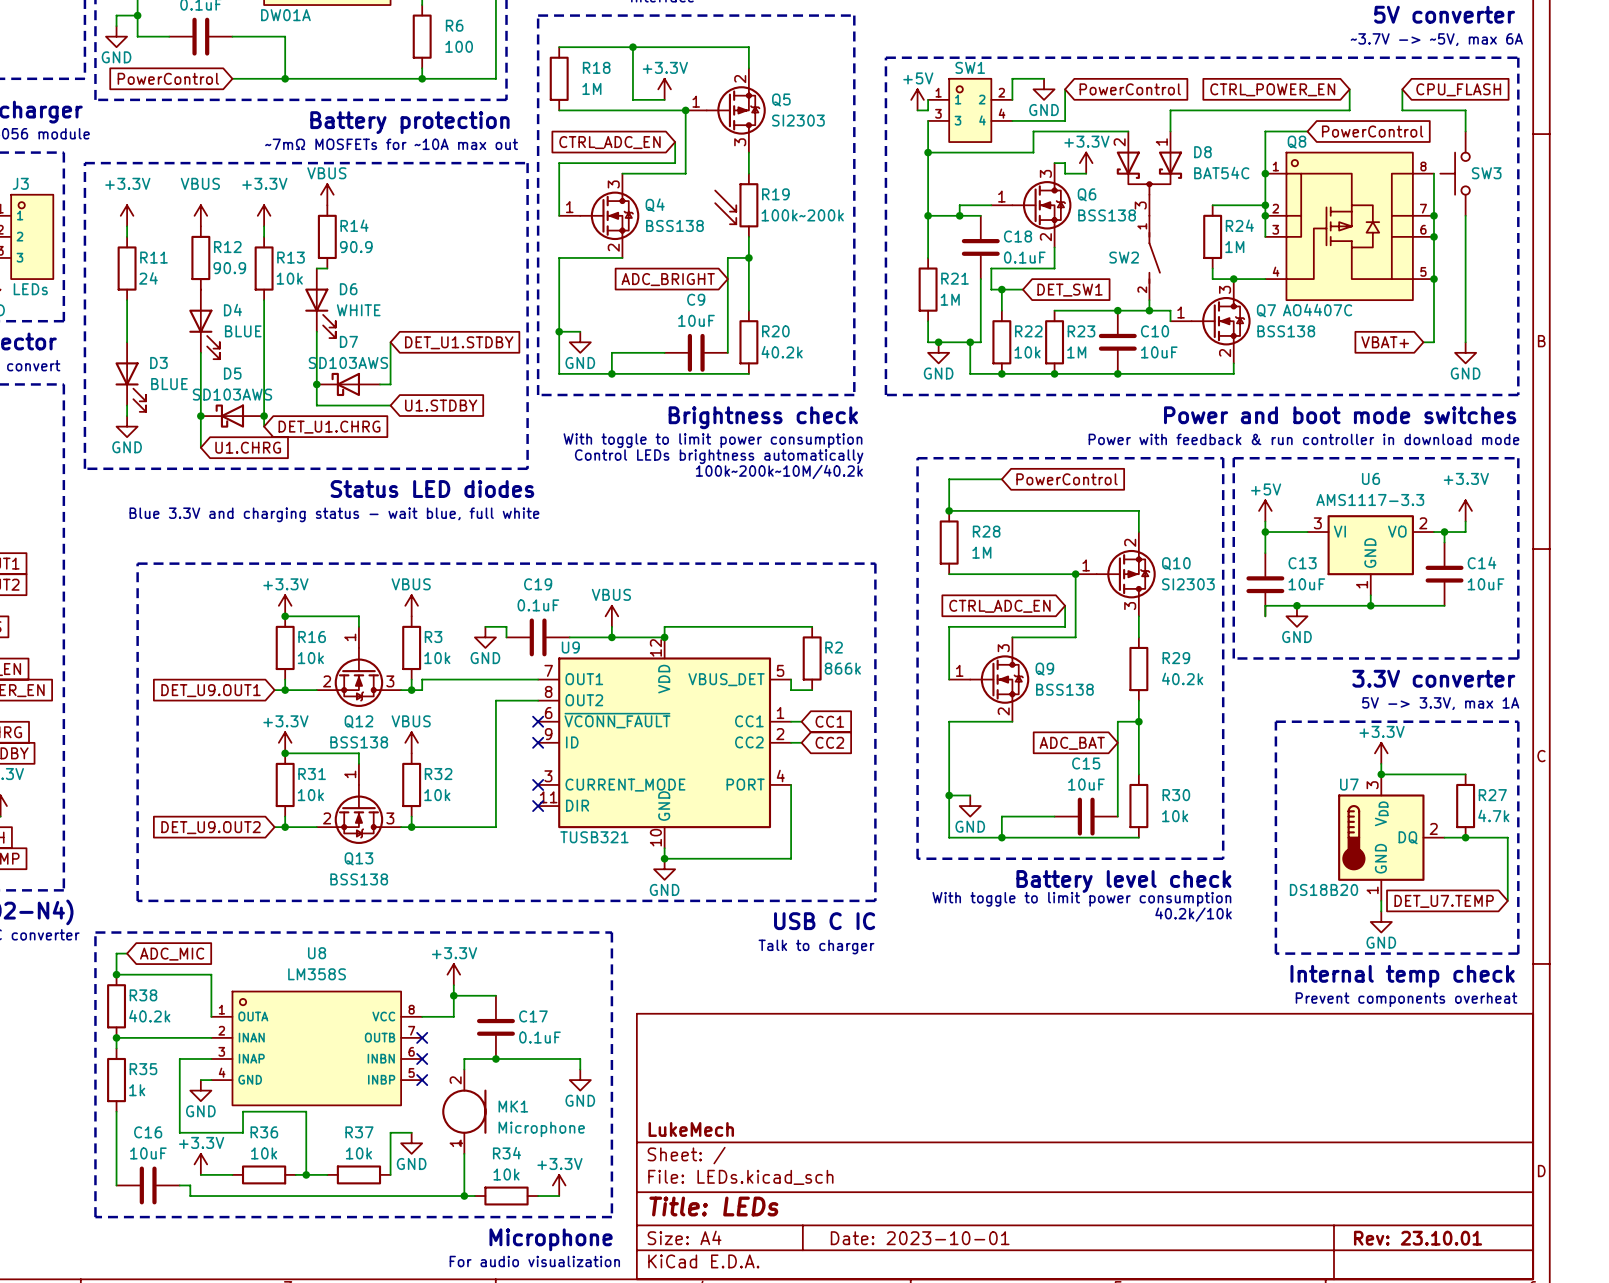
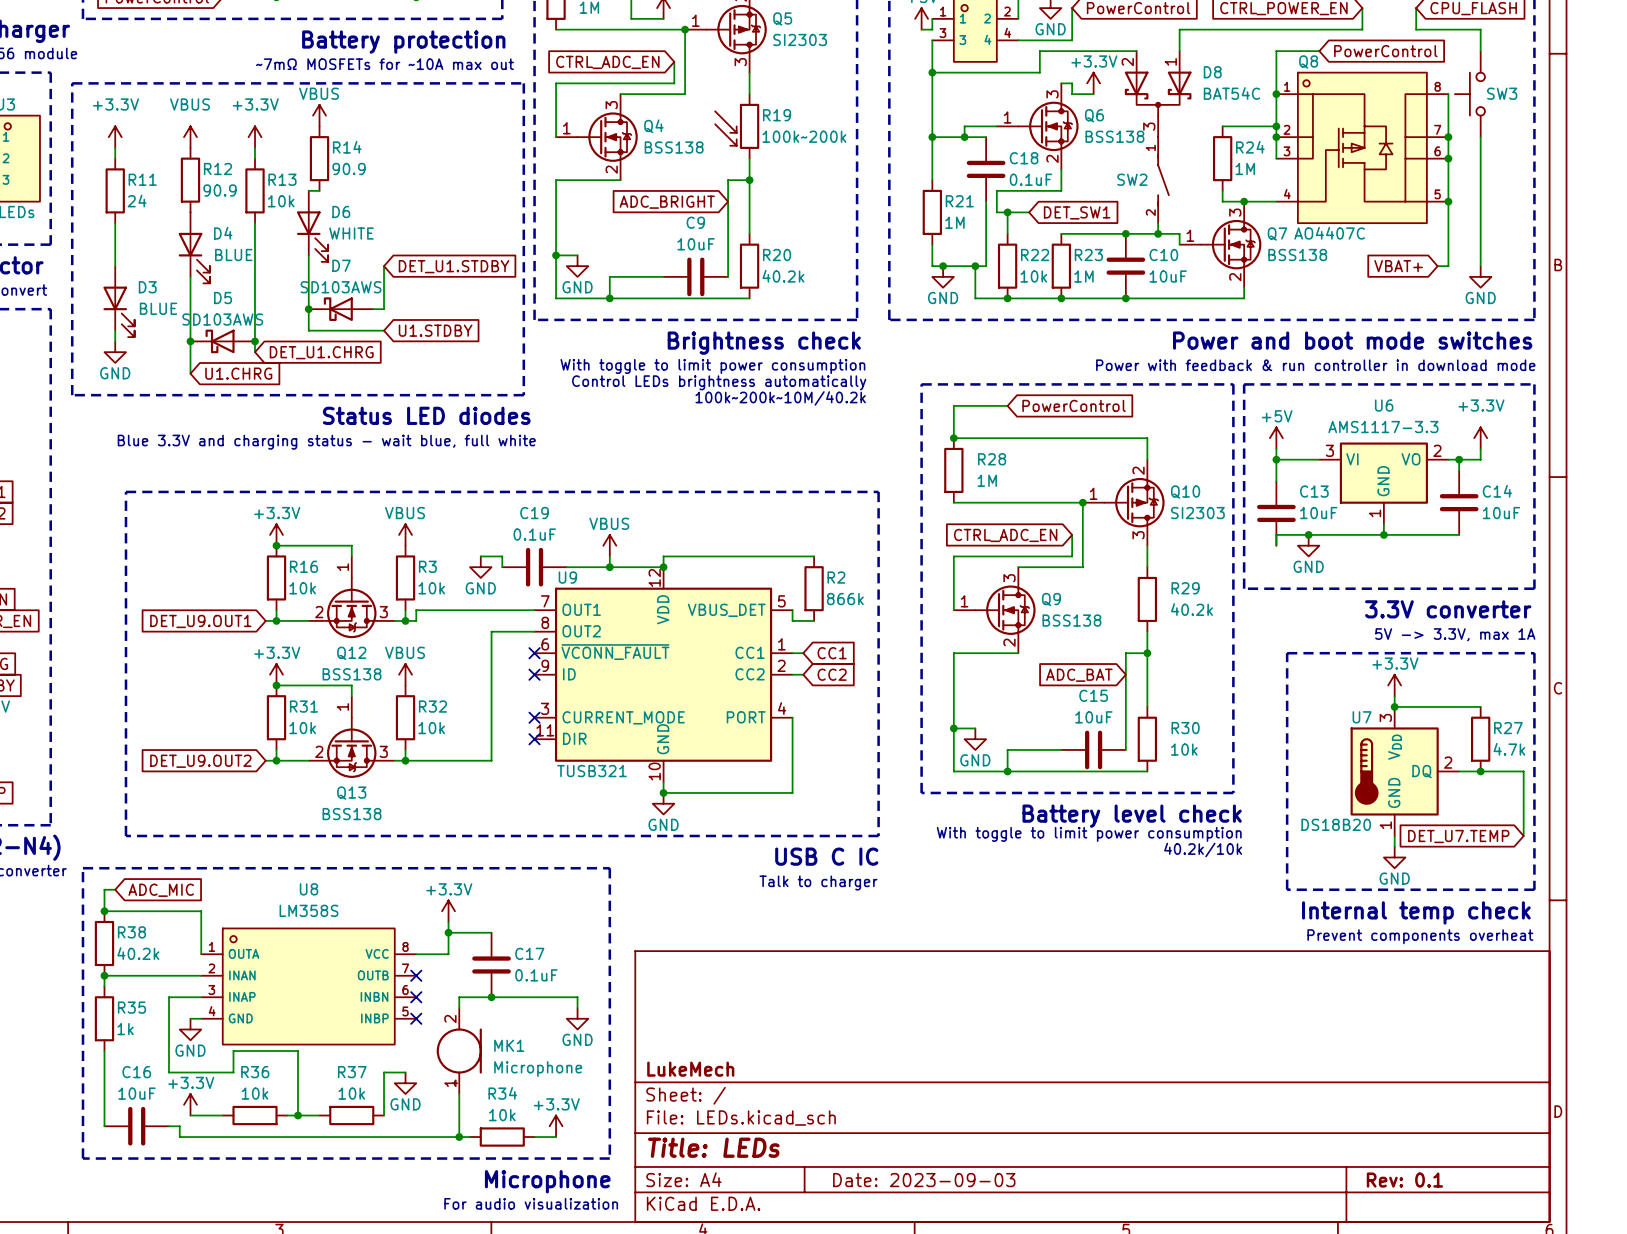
title block: Date: 2023-10-01 (920, 1238) -> Date: 2023-09-03 (924, 1180)
title block: Rev: 23.10.01 (1418, 1238) -> Rev: 0.1 (1404, 1180)

